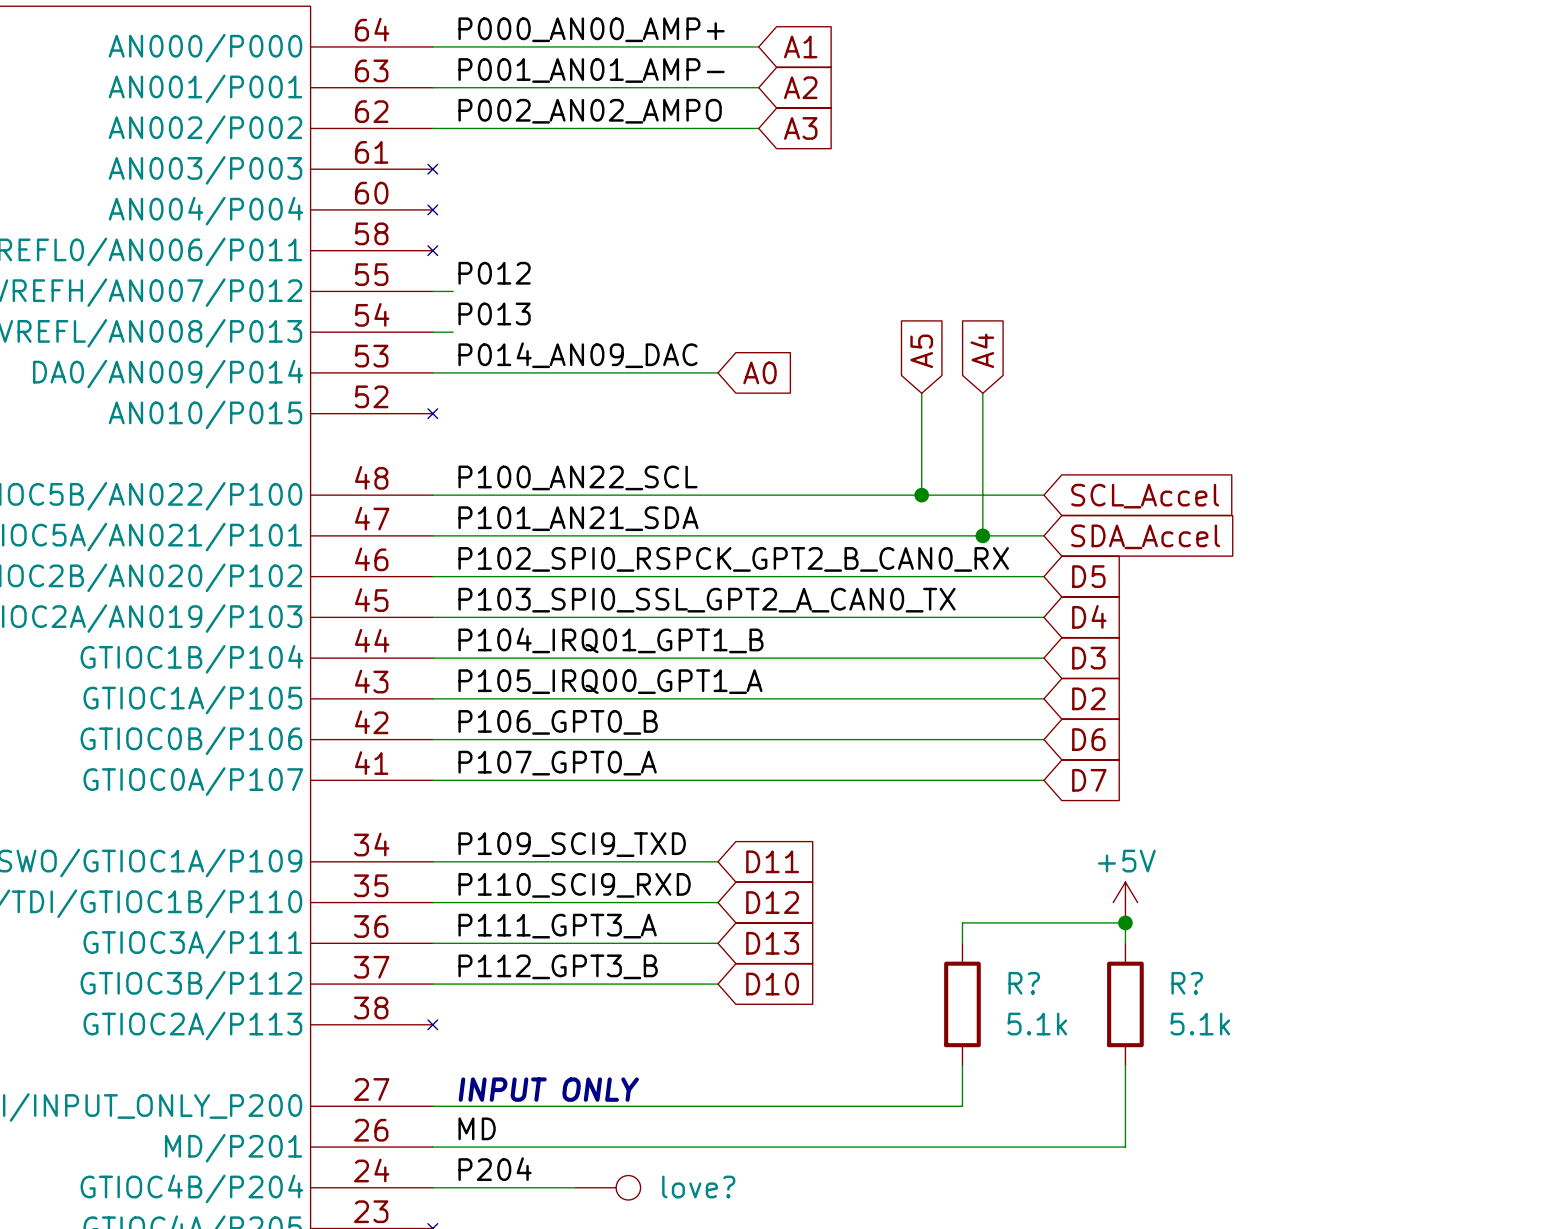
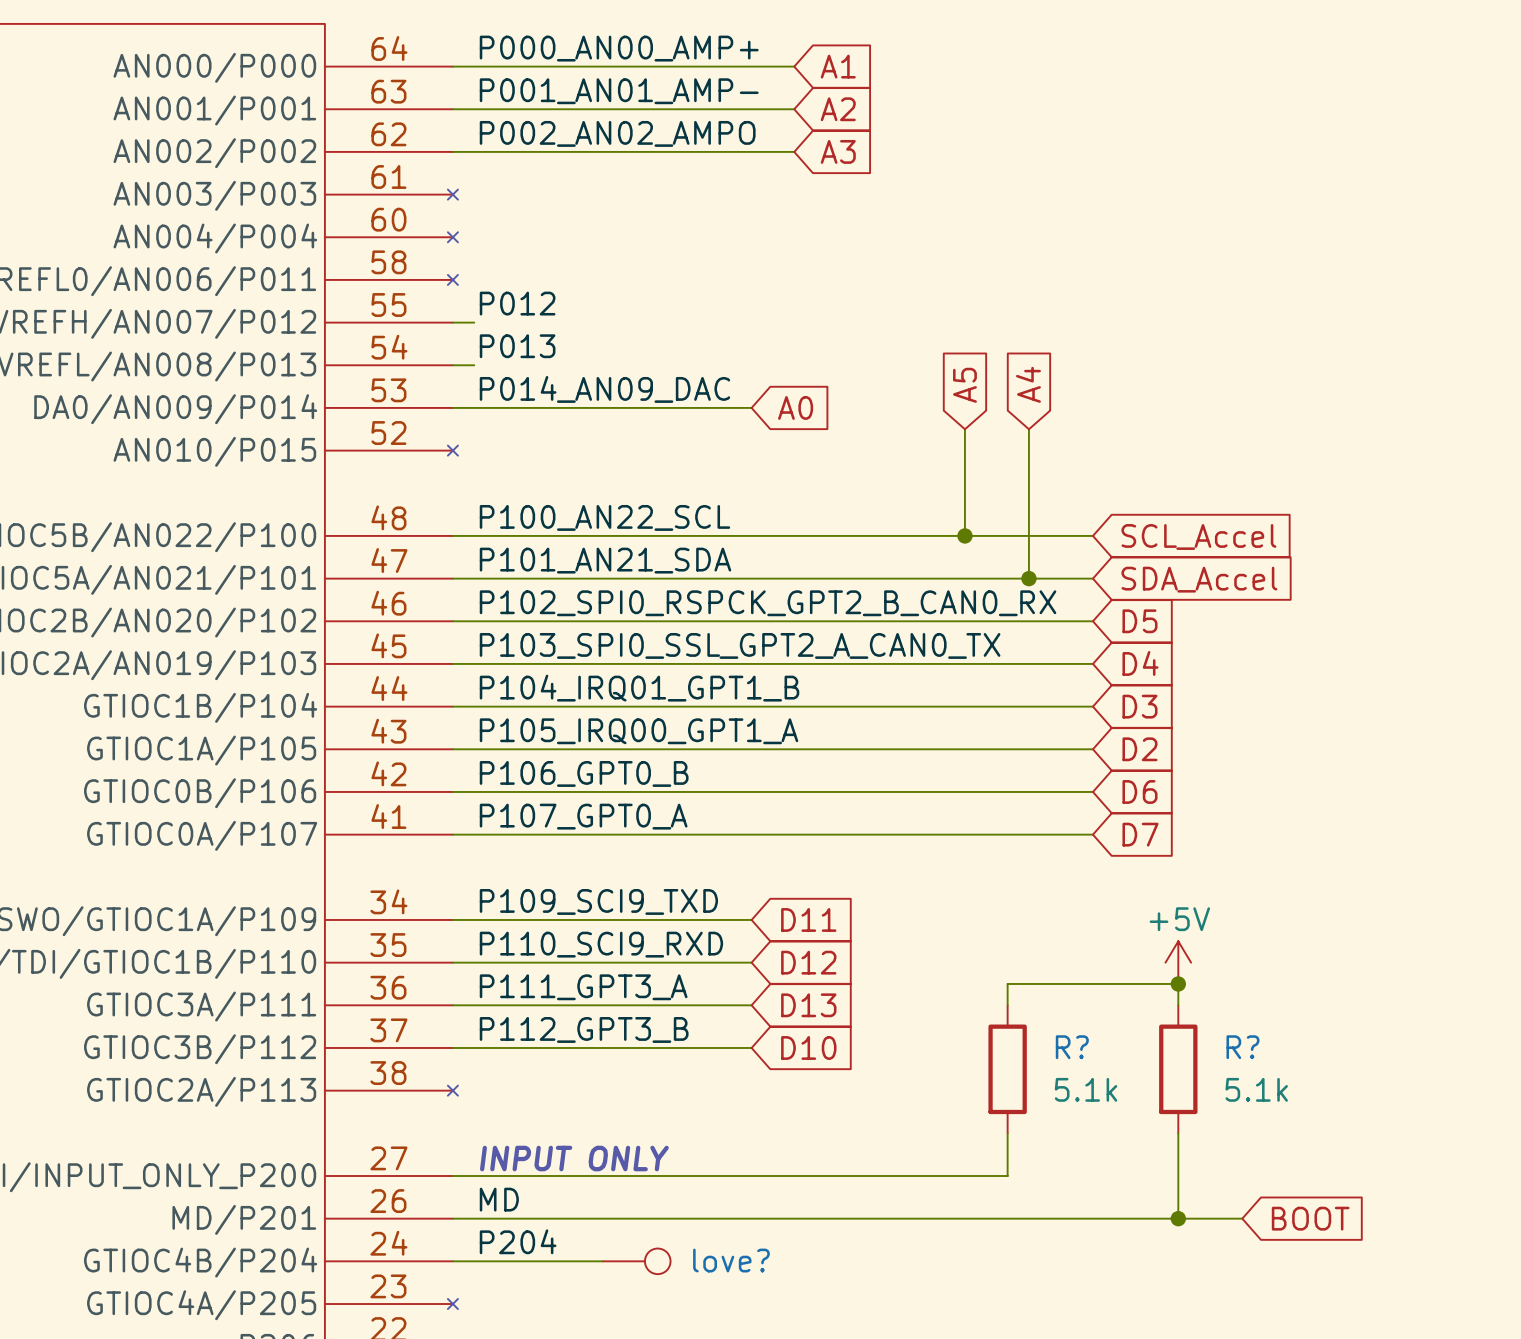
wire: none -> (1178, 1218) (1242, 1218)
junction: none -> (1178, 1218)
global label: none -> BOOT (1310, 1218)

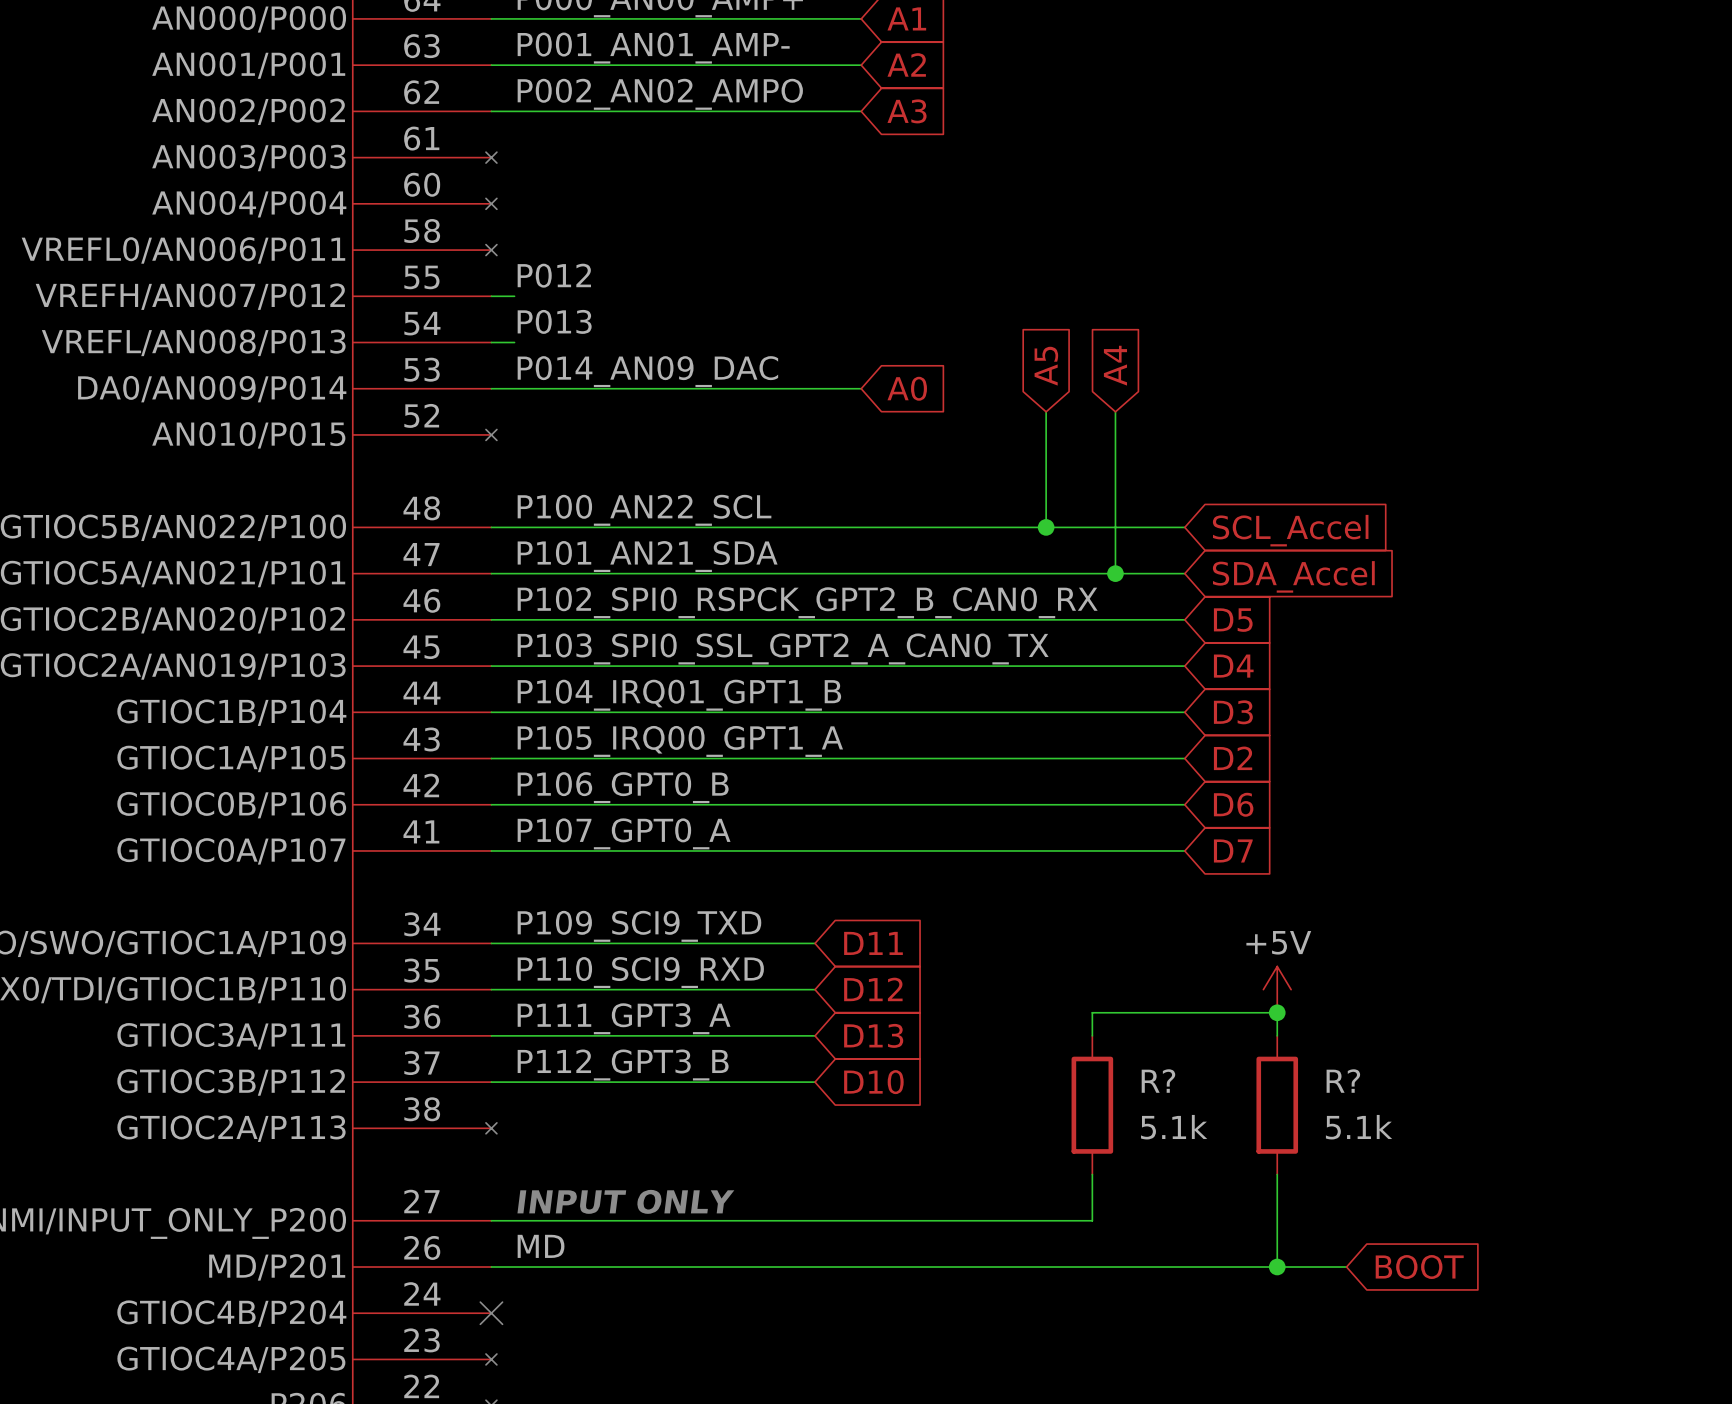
wire: none -> (815, 388) (861, 388)
global label position: A0 (795, 407) -> A0 (907, 388)
label: P204 (518, 1241) -> none
wire: (452, 1261) (602, 1261) -> none
no-connect mark: none -> (491, 1313)
love?: (636, 1261) -> none

